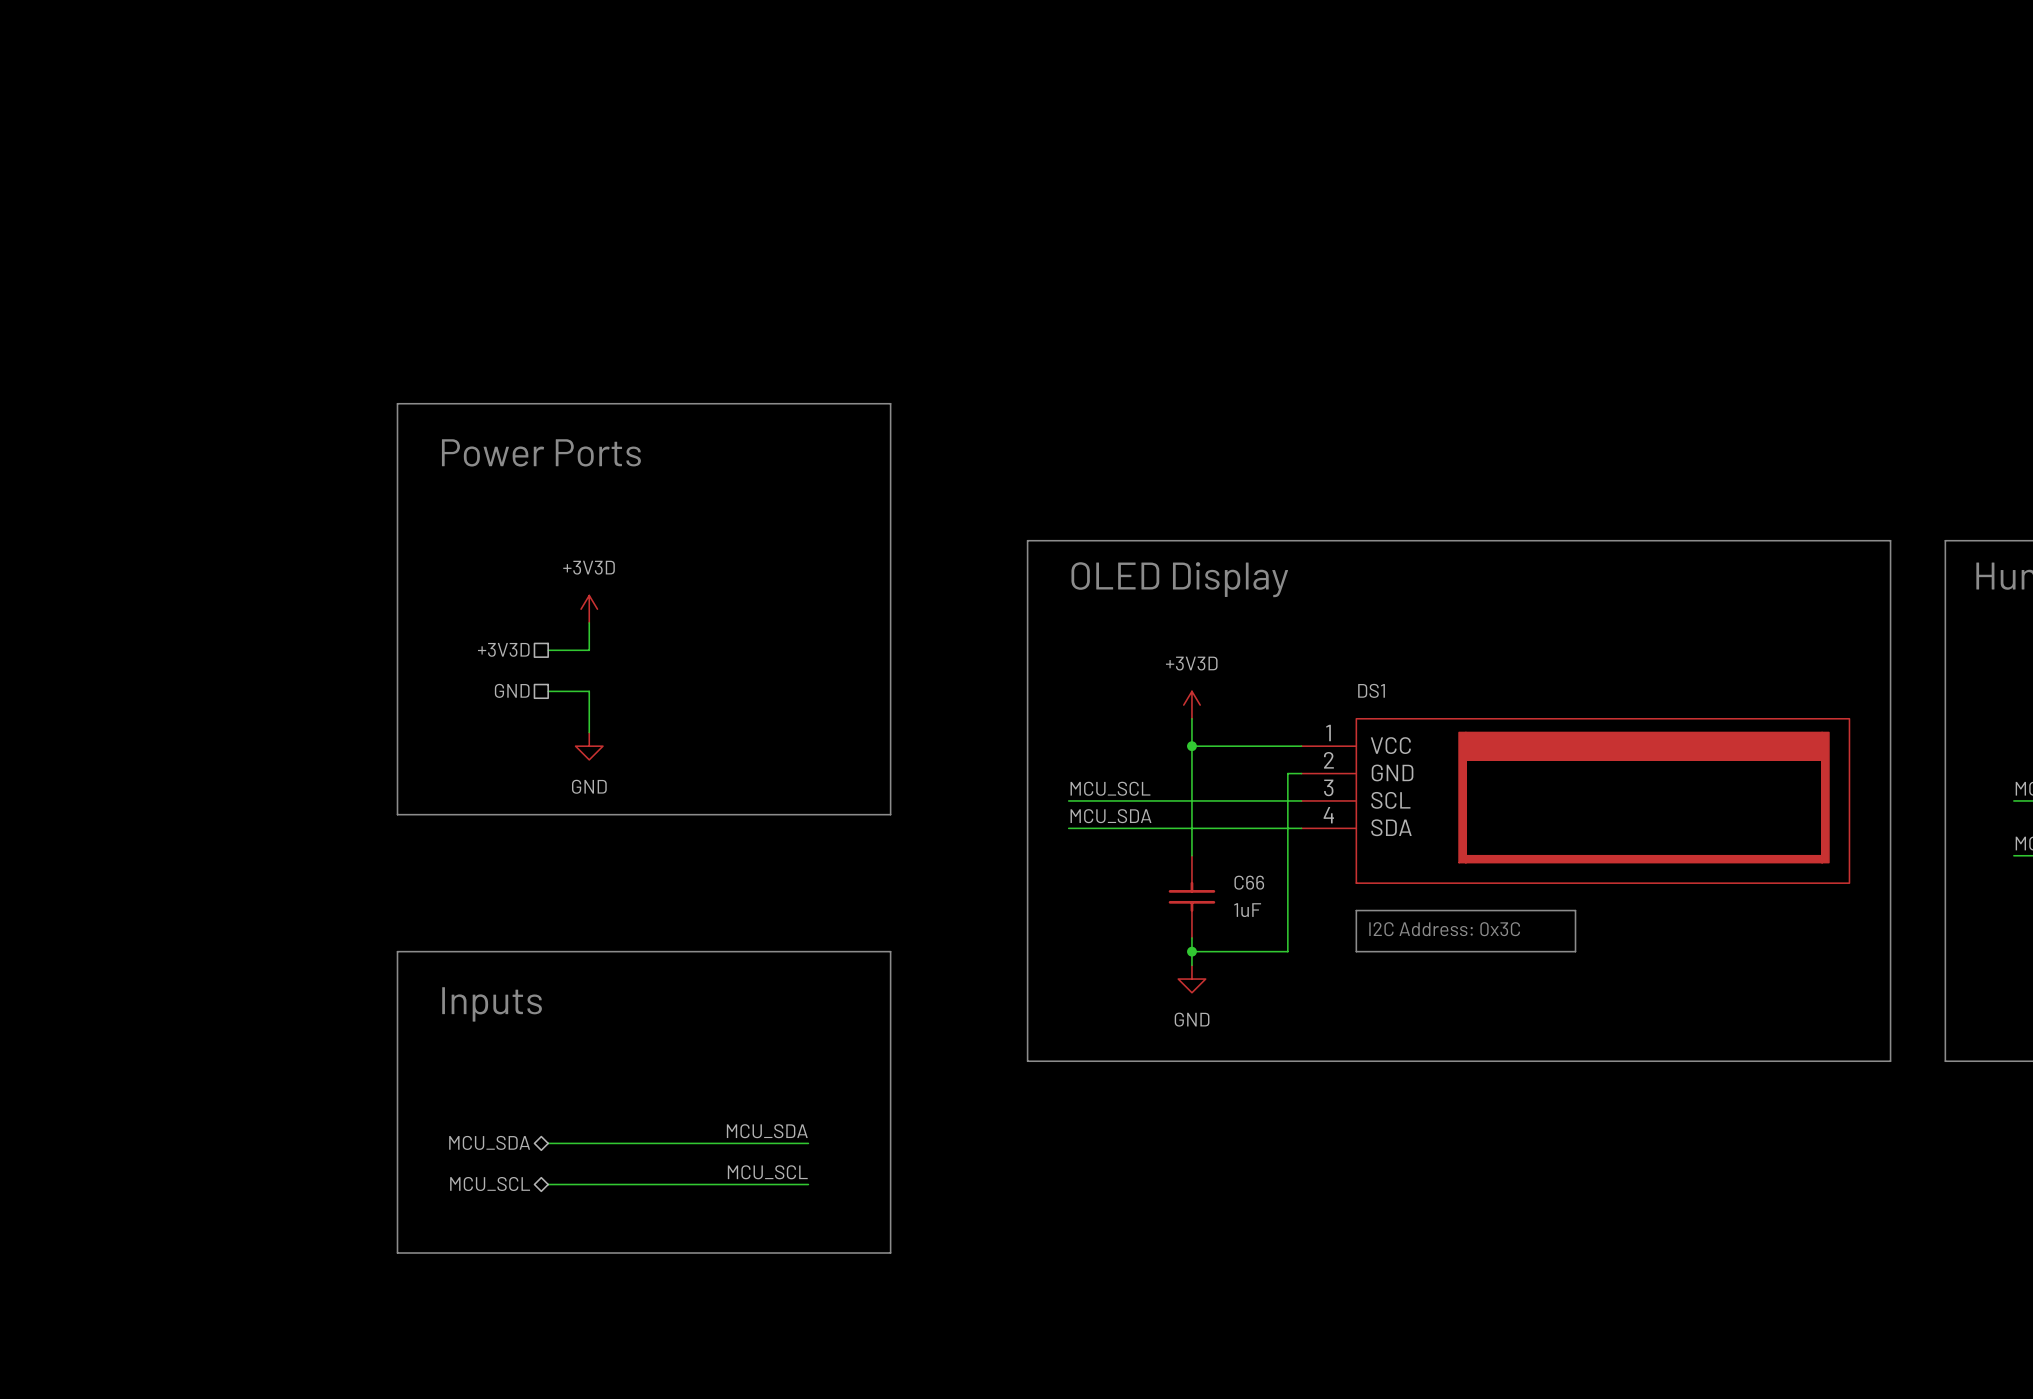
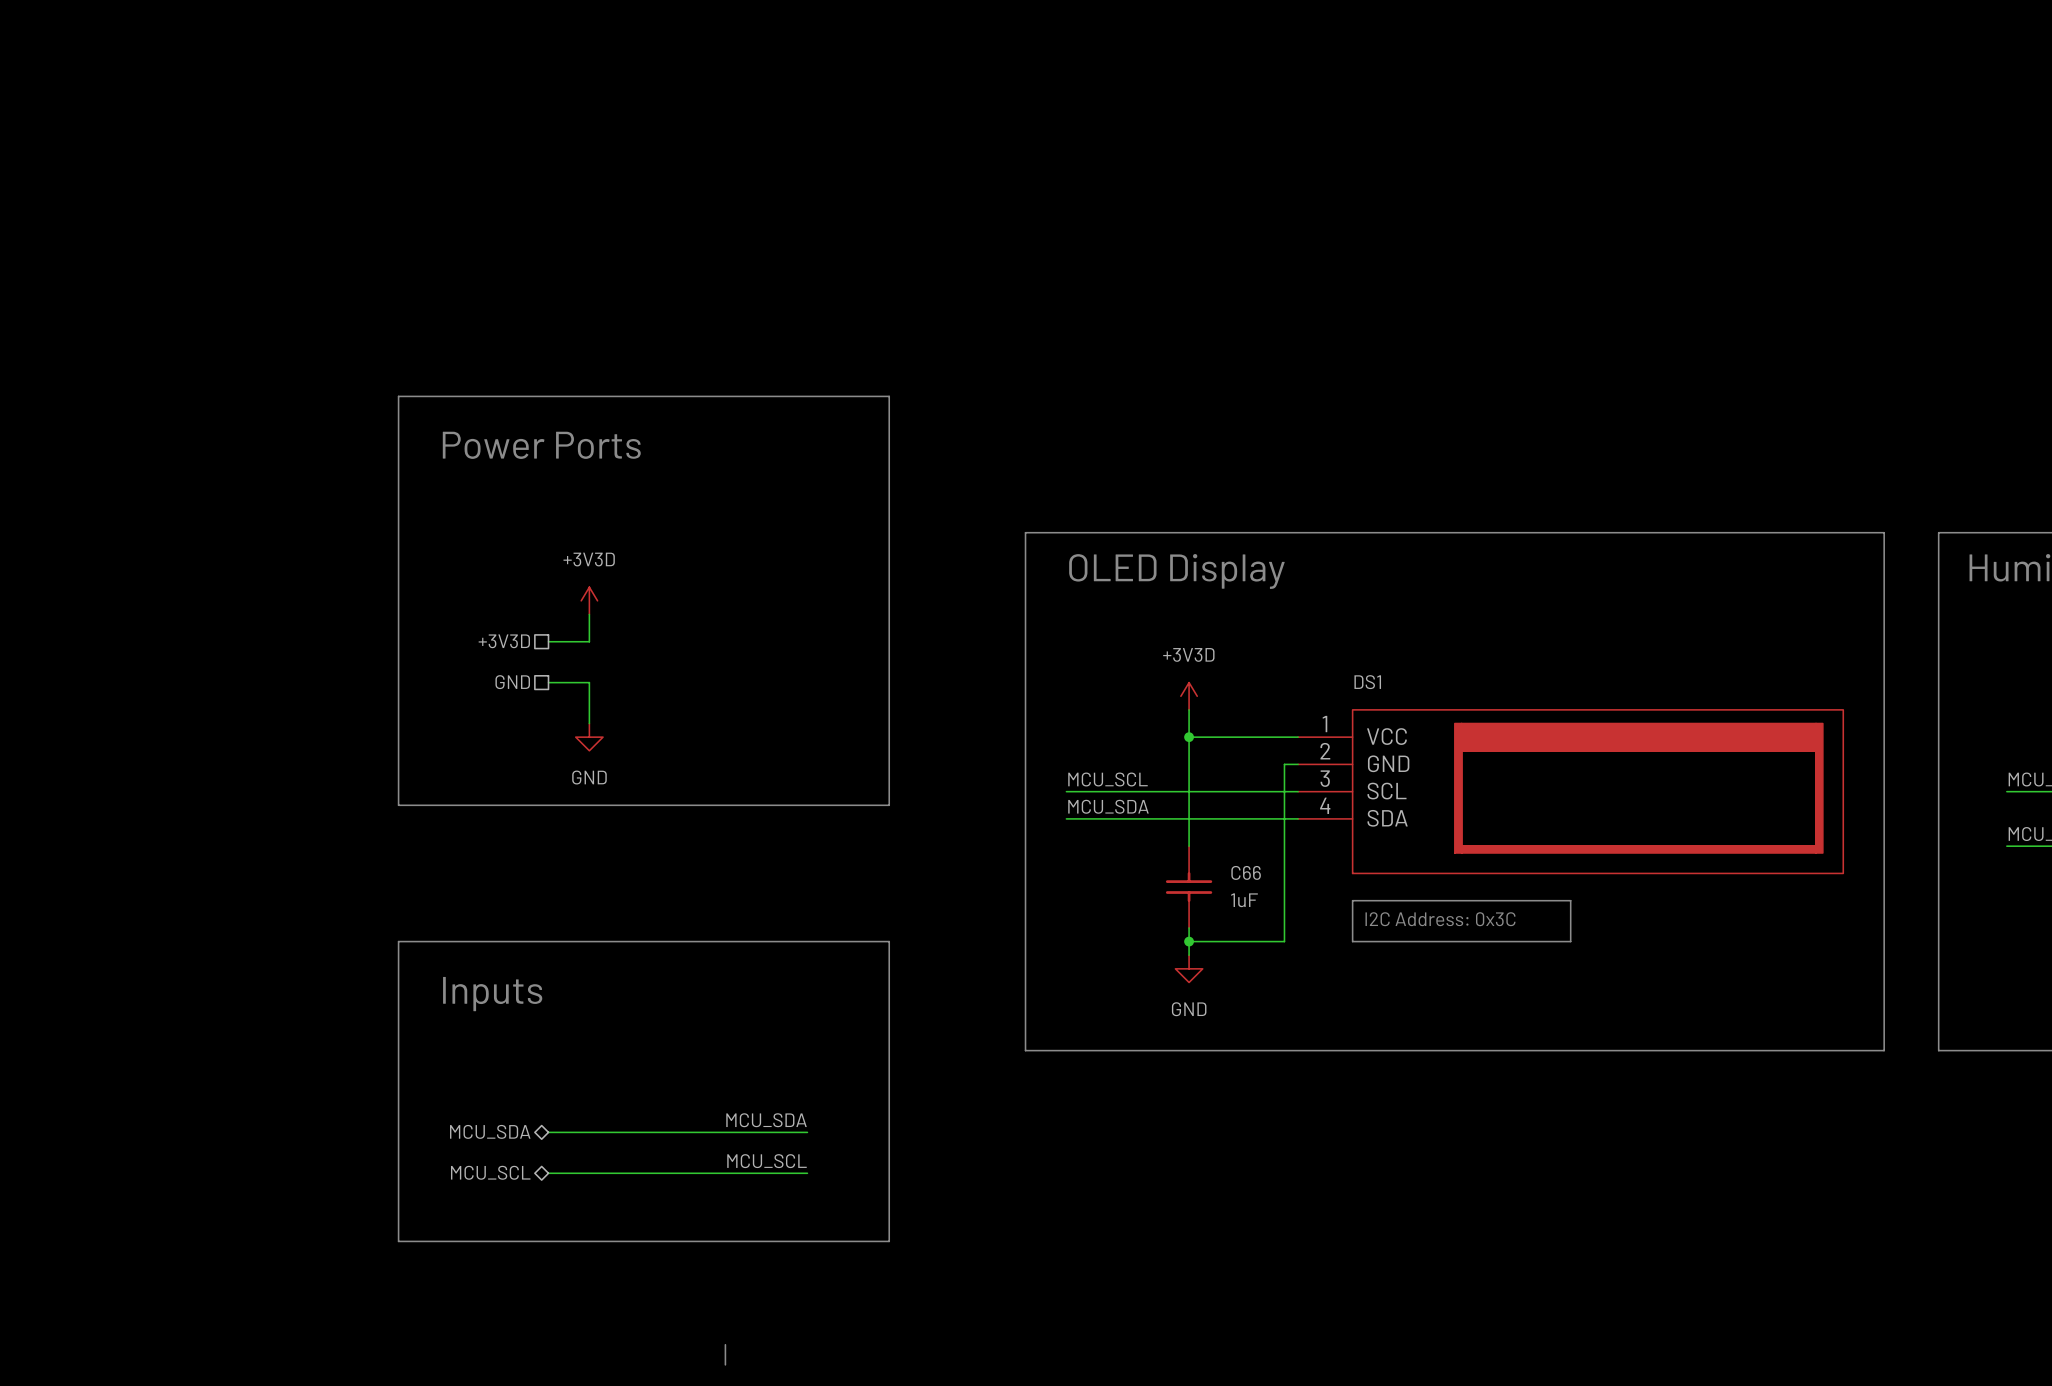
line: none -> (725, 1344) (725, 1364)

